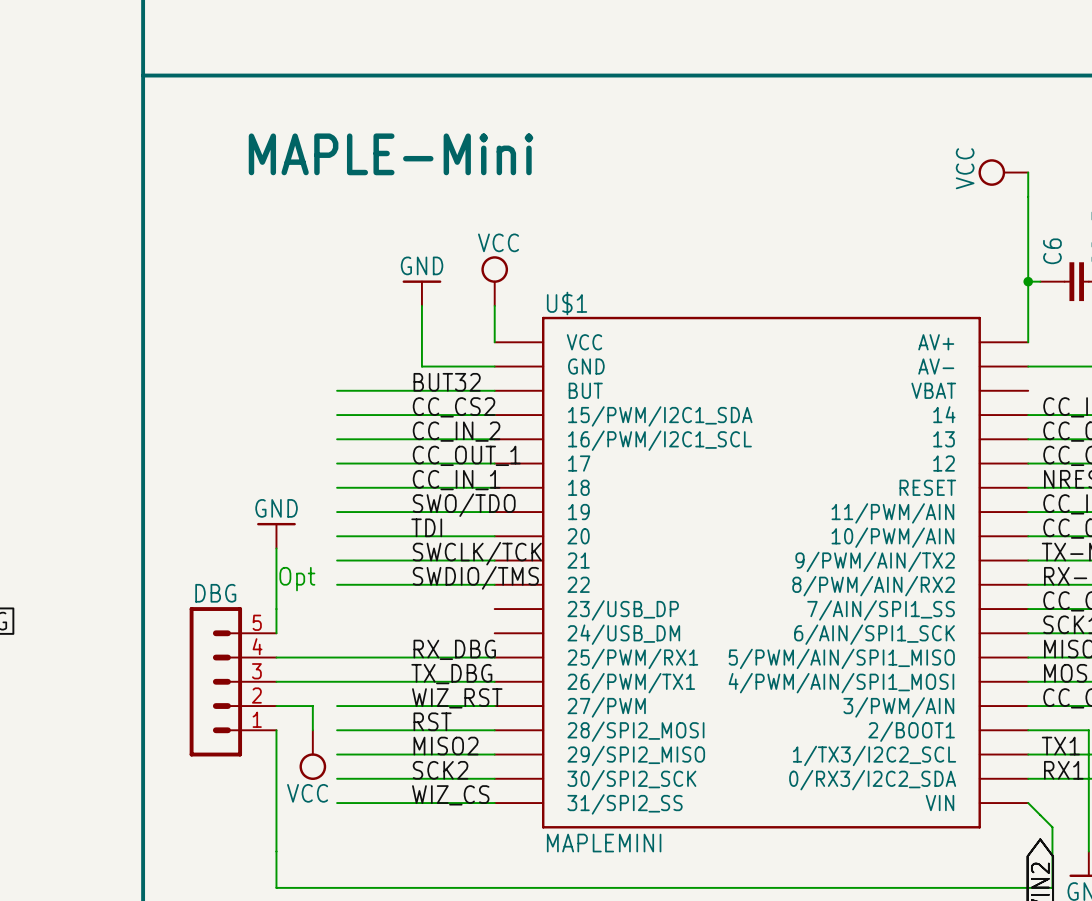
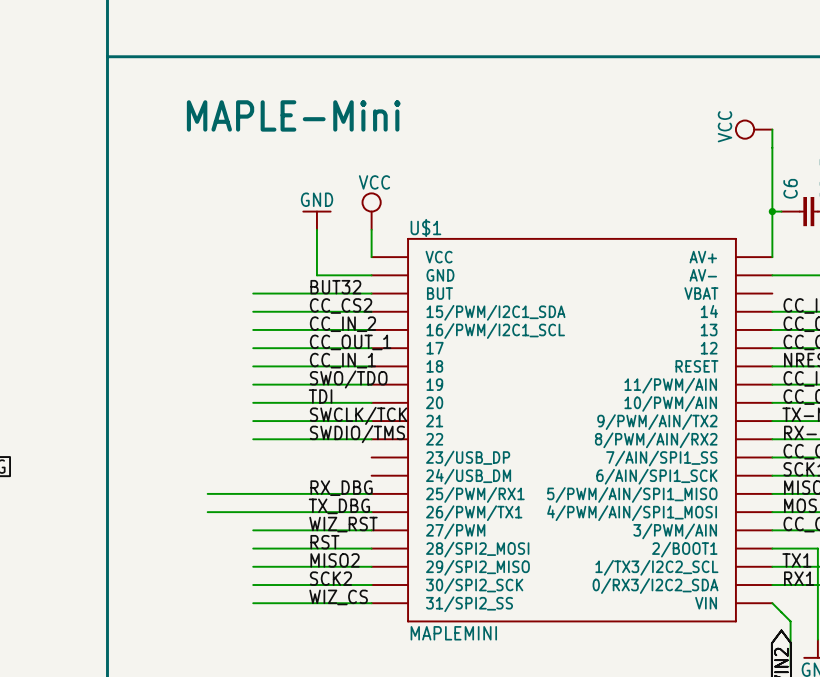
power symbol: GND (276, 535) -> none
wire: (276, 548) (276, 633) -> none
text: Opt (297, 579) -> none
DBG: (233, 681) -> none
wire: (276, 706) (312, 706) (312, 730) -> none
wire: (276, 730) (276, 887) (1052, 887) -> none
power symbol: VCC (312, 755) -> none

